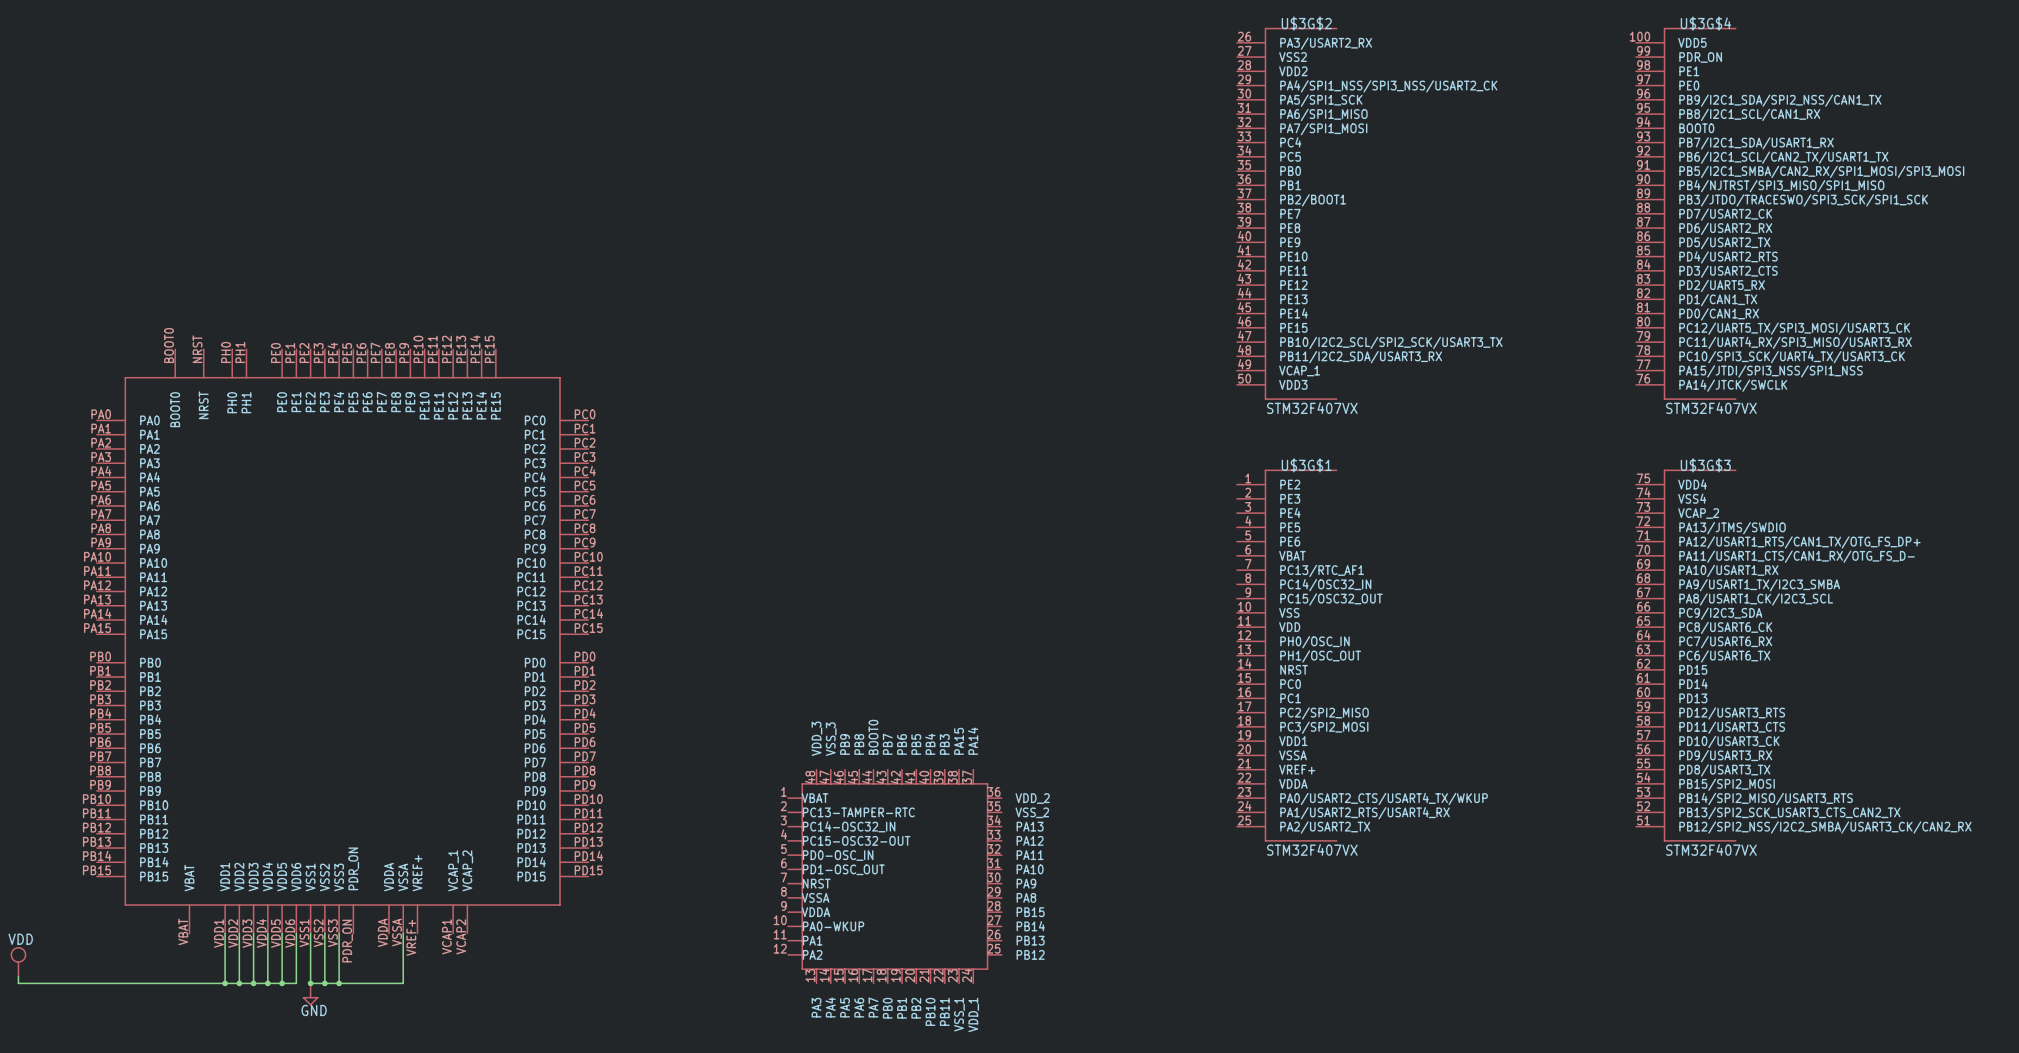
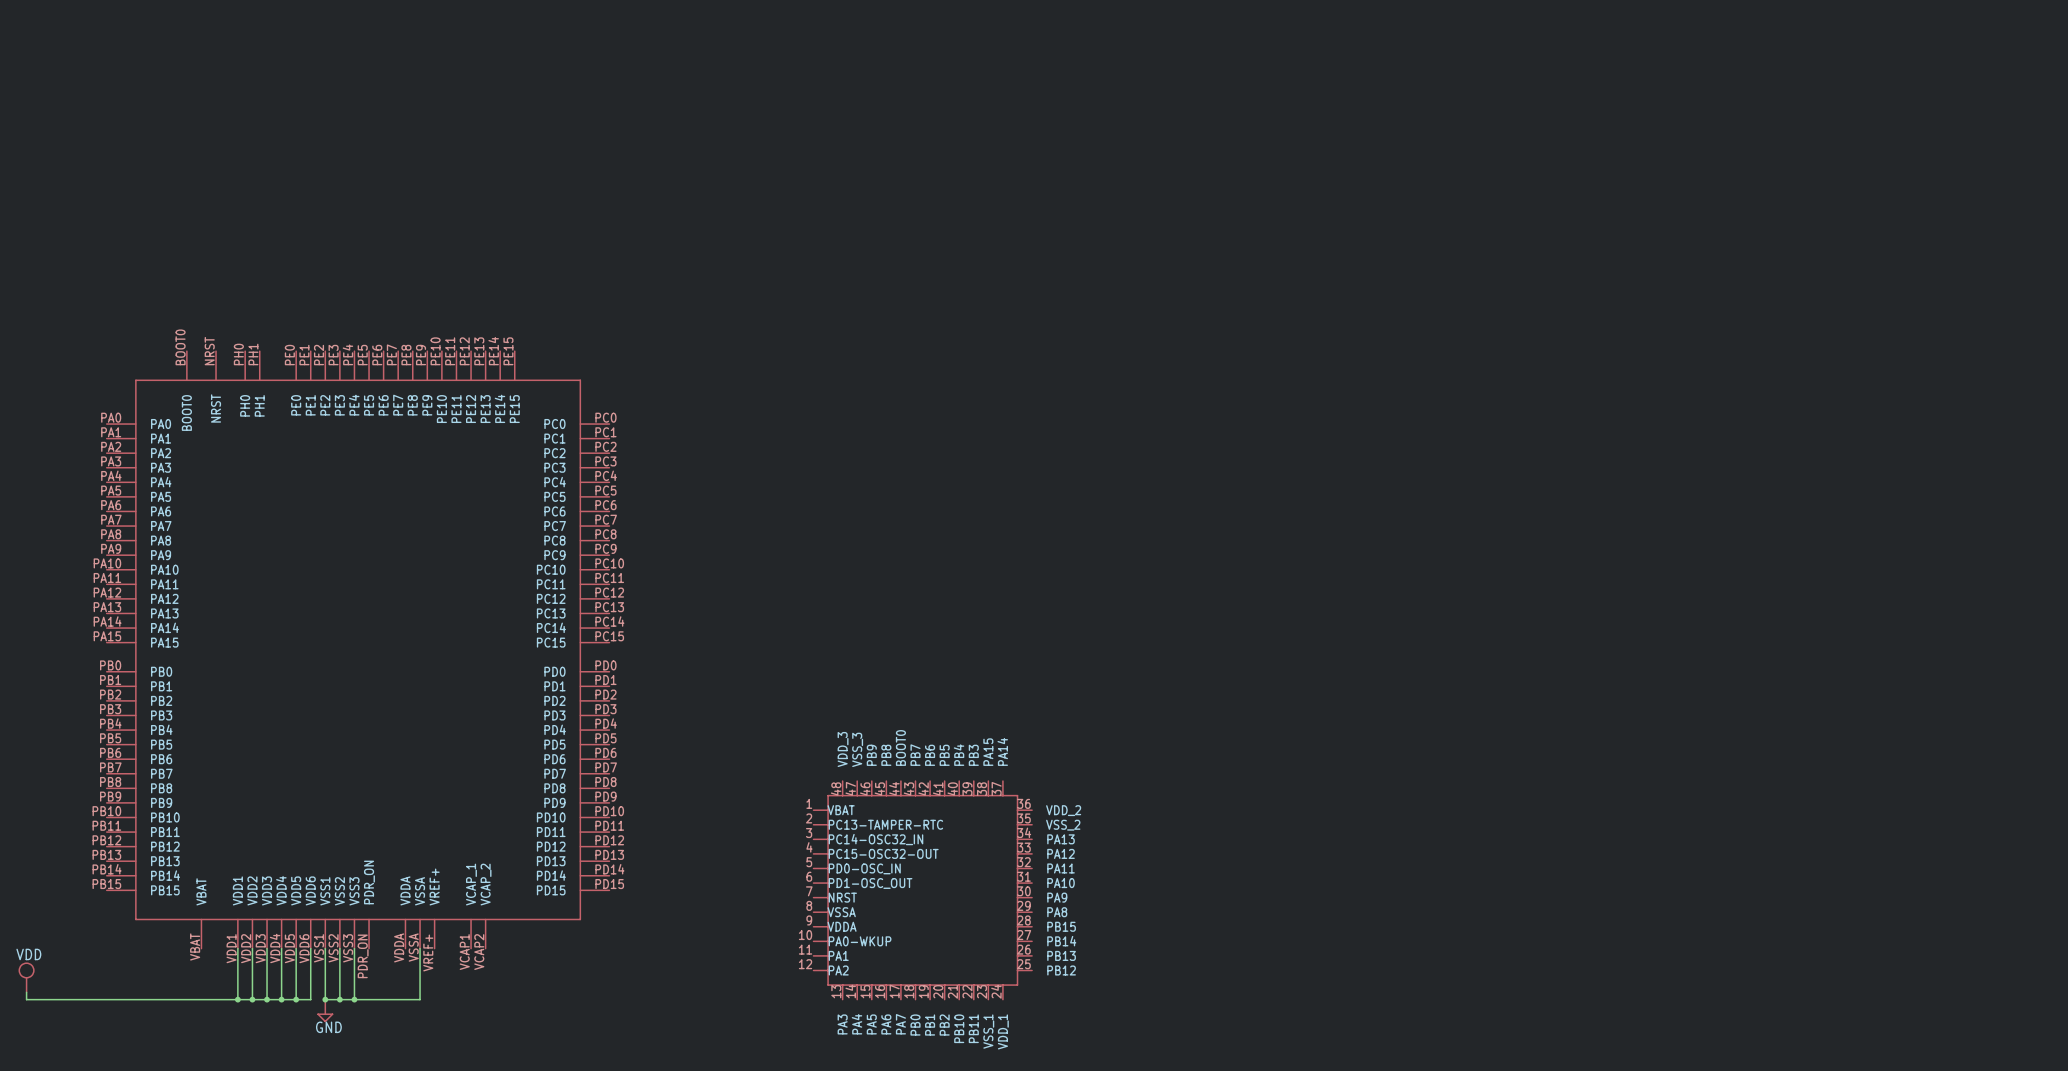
U$3G$2: STM32F407VX (1287, 213) -> none
U$3G$4: STM32F407VX (1686, 213) -> none
U$3G$1: STM32F407VX (1287, 655) -> none
U$3G$3: STM32F407VX (1686, 655) -> none

